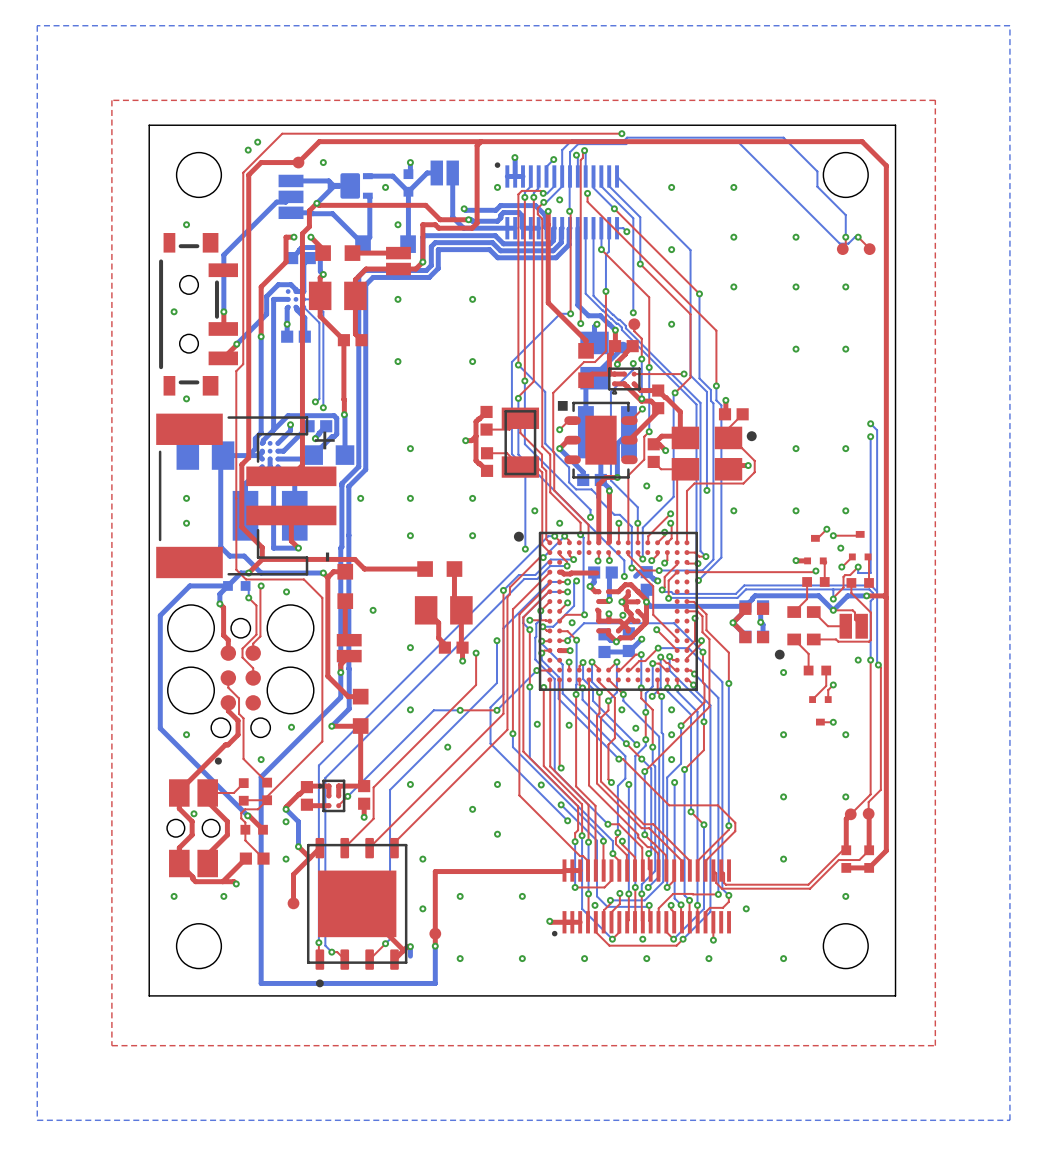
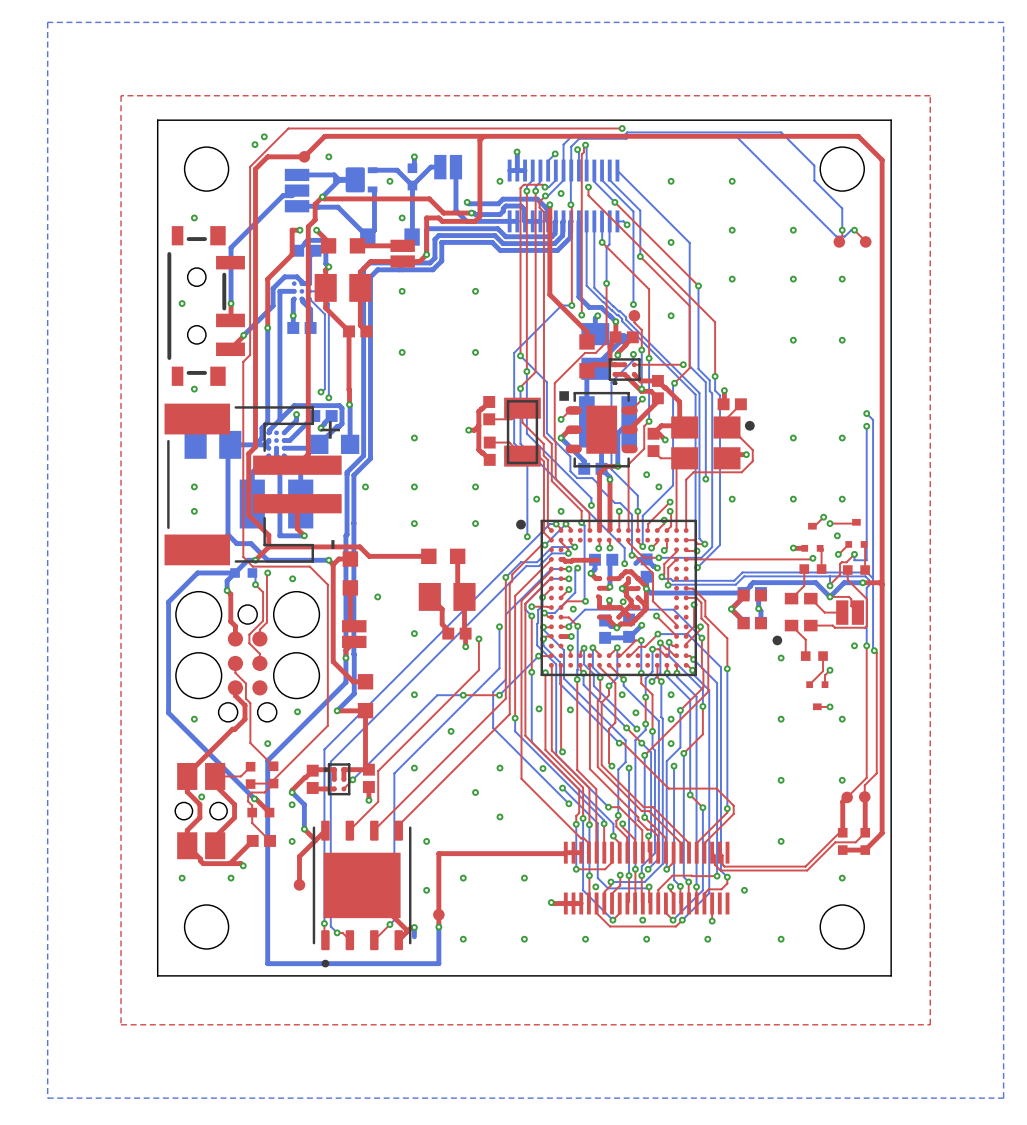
part footprint: [494, 162, 619, 240] -> [507, 159, 620, 233]
part footprint: [167, 757, 222, 878] -> [175, 762, 228, 860]
part footprint: [306, 837, 408, 988] -> [312, 820, 412, 968]
part footprint: [551, 859, 731, 937] -> [563, 841, 730, 915]

